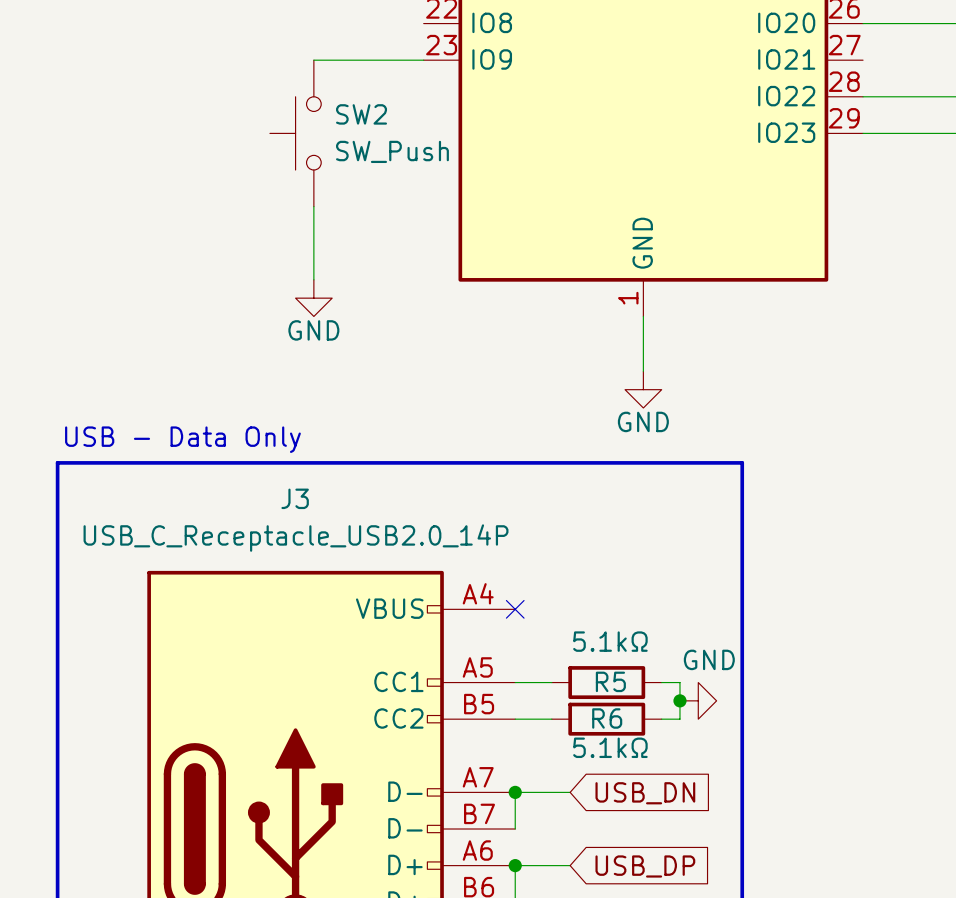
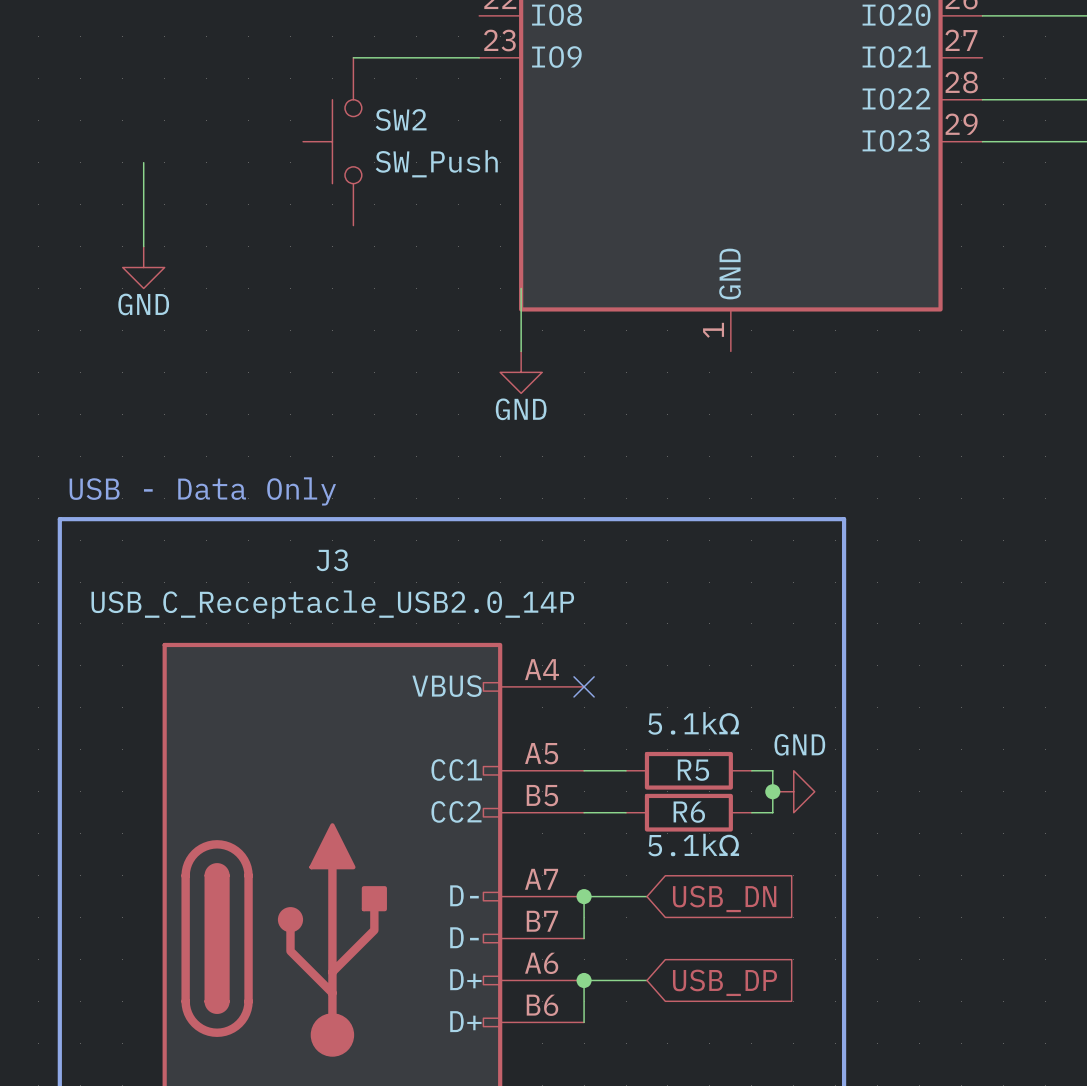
wire: (313, 206) (313, 279) -> (143, 162) (143, 246)
power symbol: none -> GND (143, 267)
power symbol: GND (313, 298) -> none
wire: (643, 316) (643, 371) -> (521, 288) (521, 351)
power symbol: none -> GND (521, 372)
power symbol: GND (643, 389) -> none

